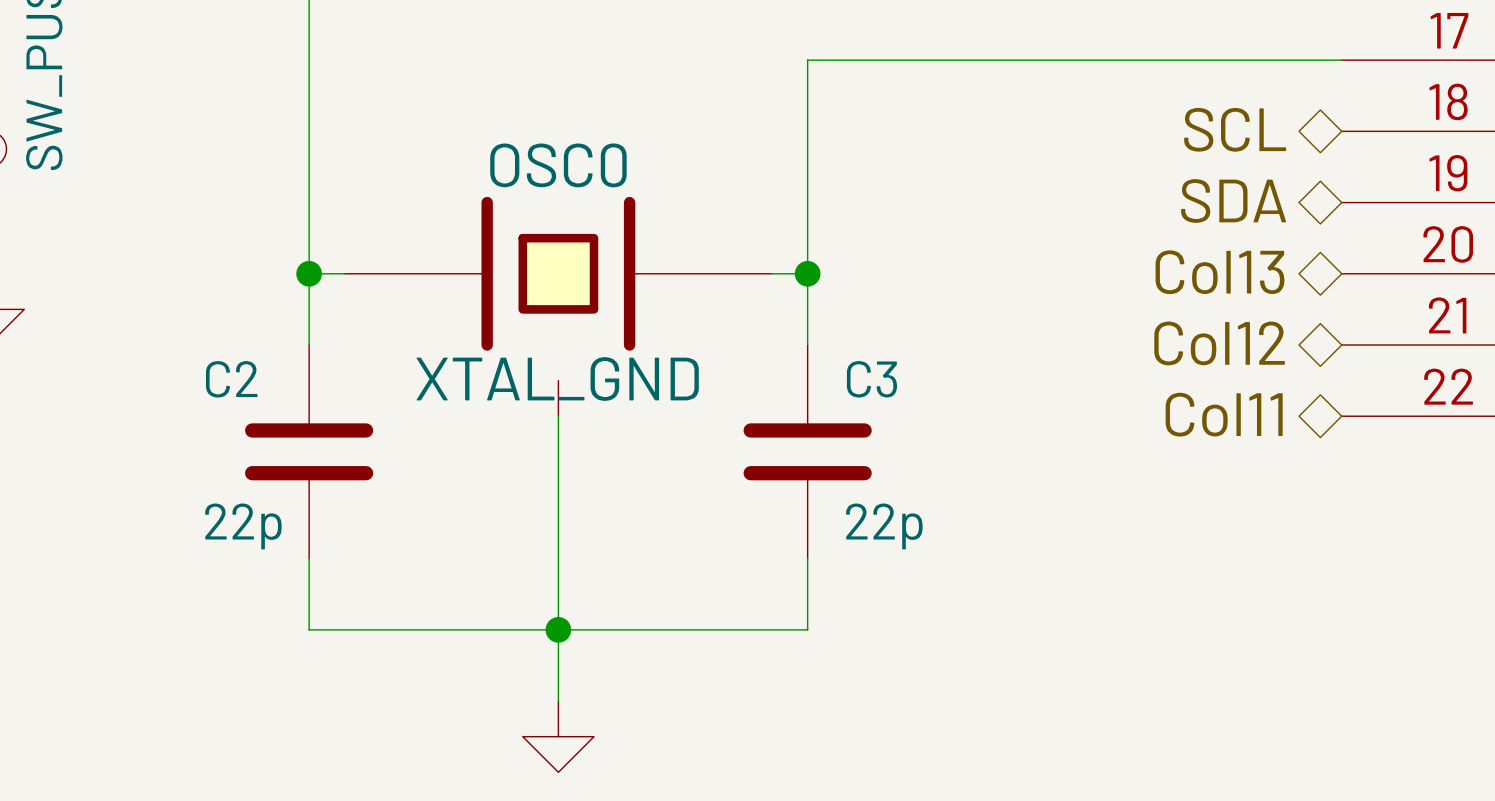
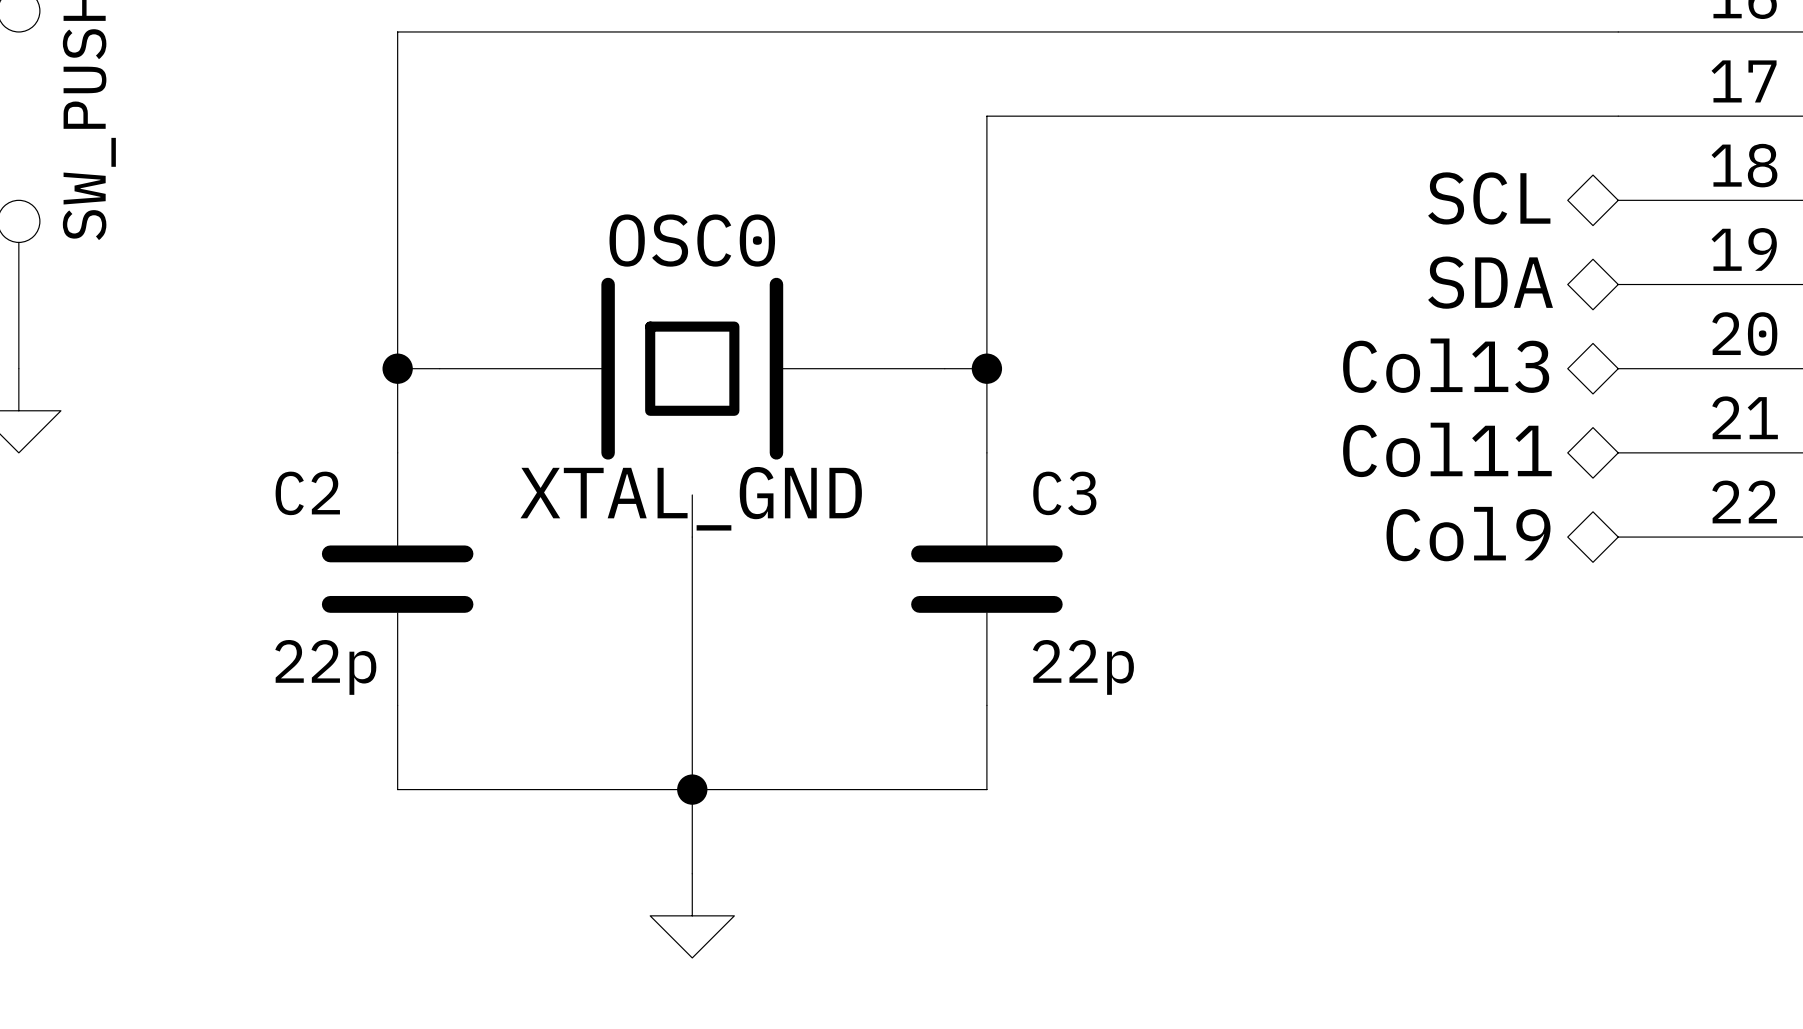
hierarchical label: Col12 (1219, 343) -> Col11 (1447, 449)
hierarchical label: Col11 (1224, 414) -> Col9 (1468, 534)

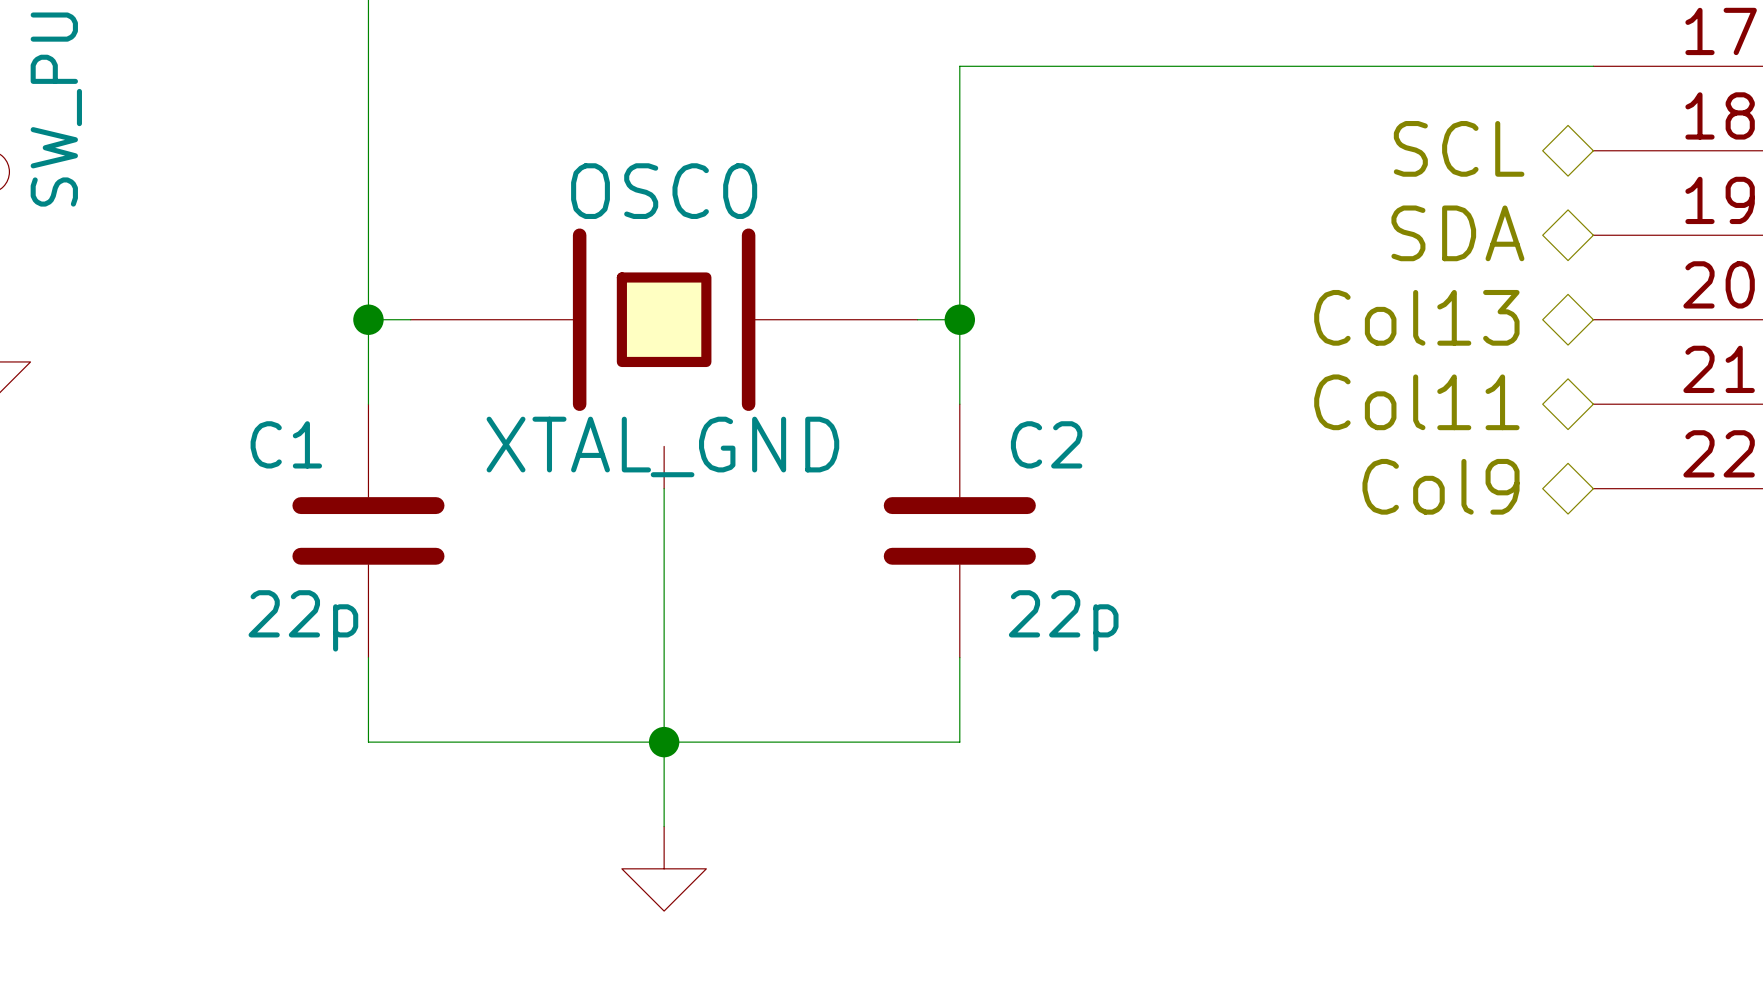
C2 name: C2 (307, 493) -> C1 (286, 444)
C3 name: C3 (1064, 493) -> C2 (1046, 444)

